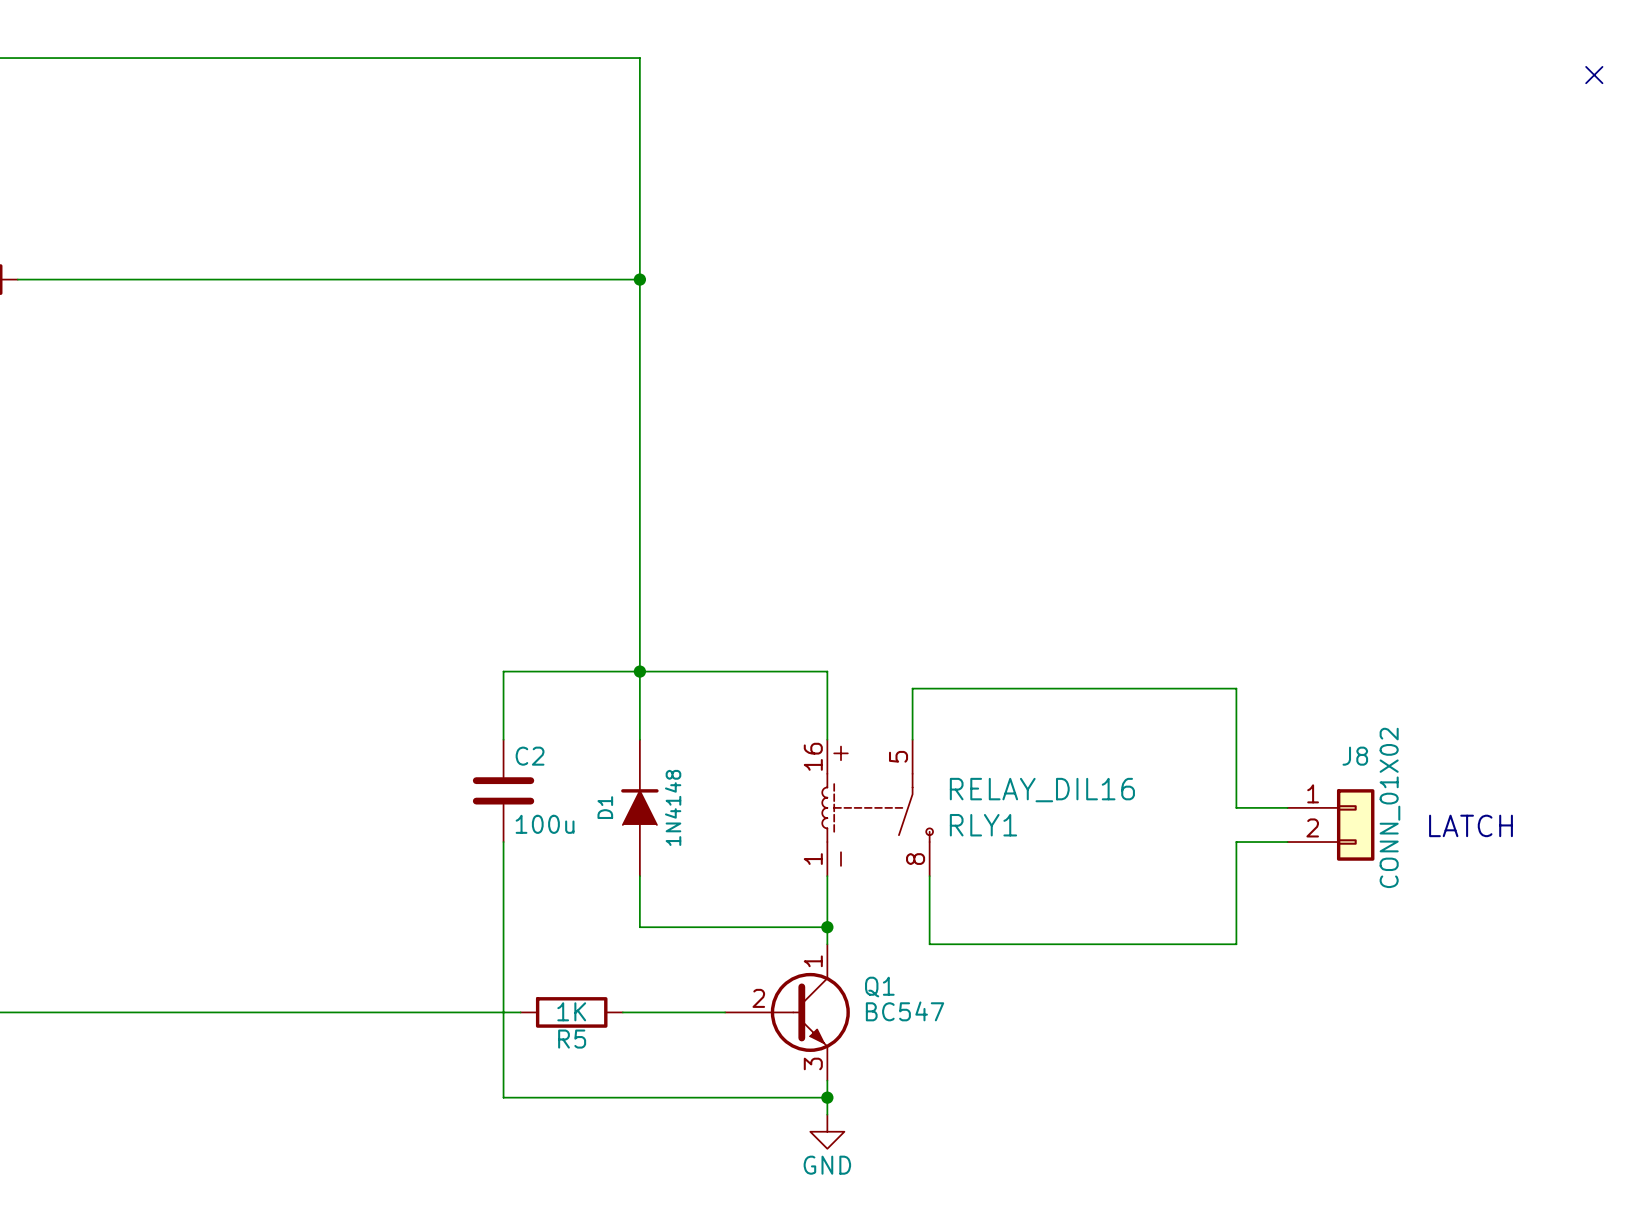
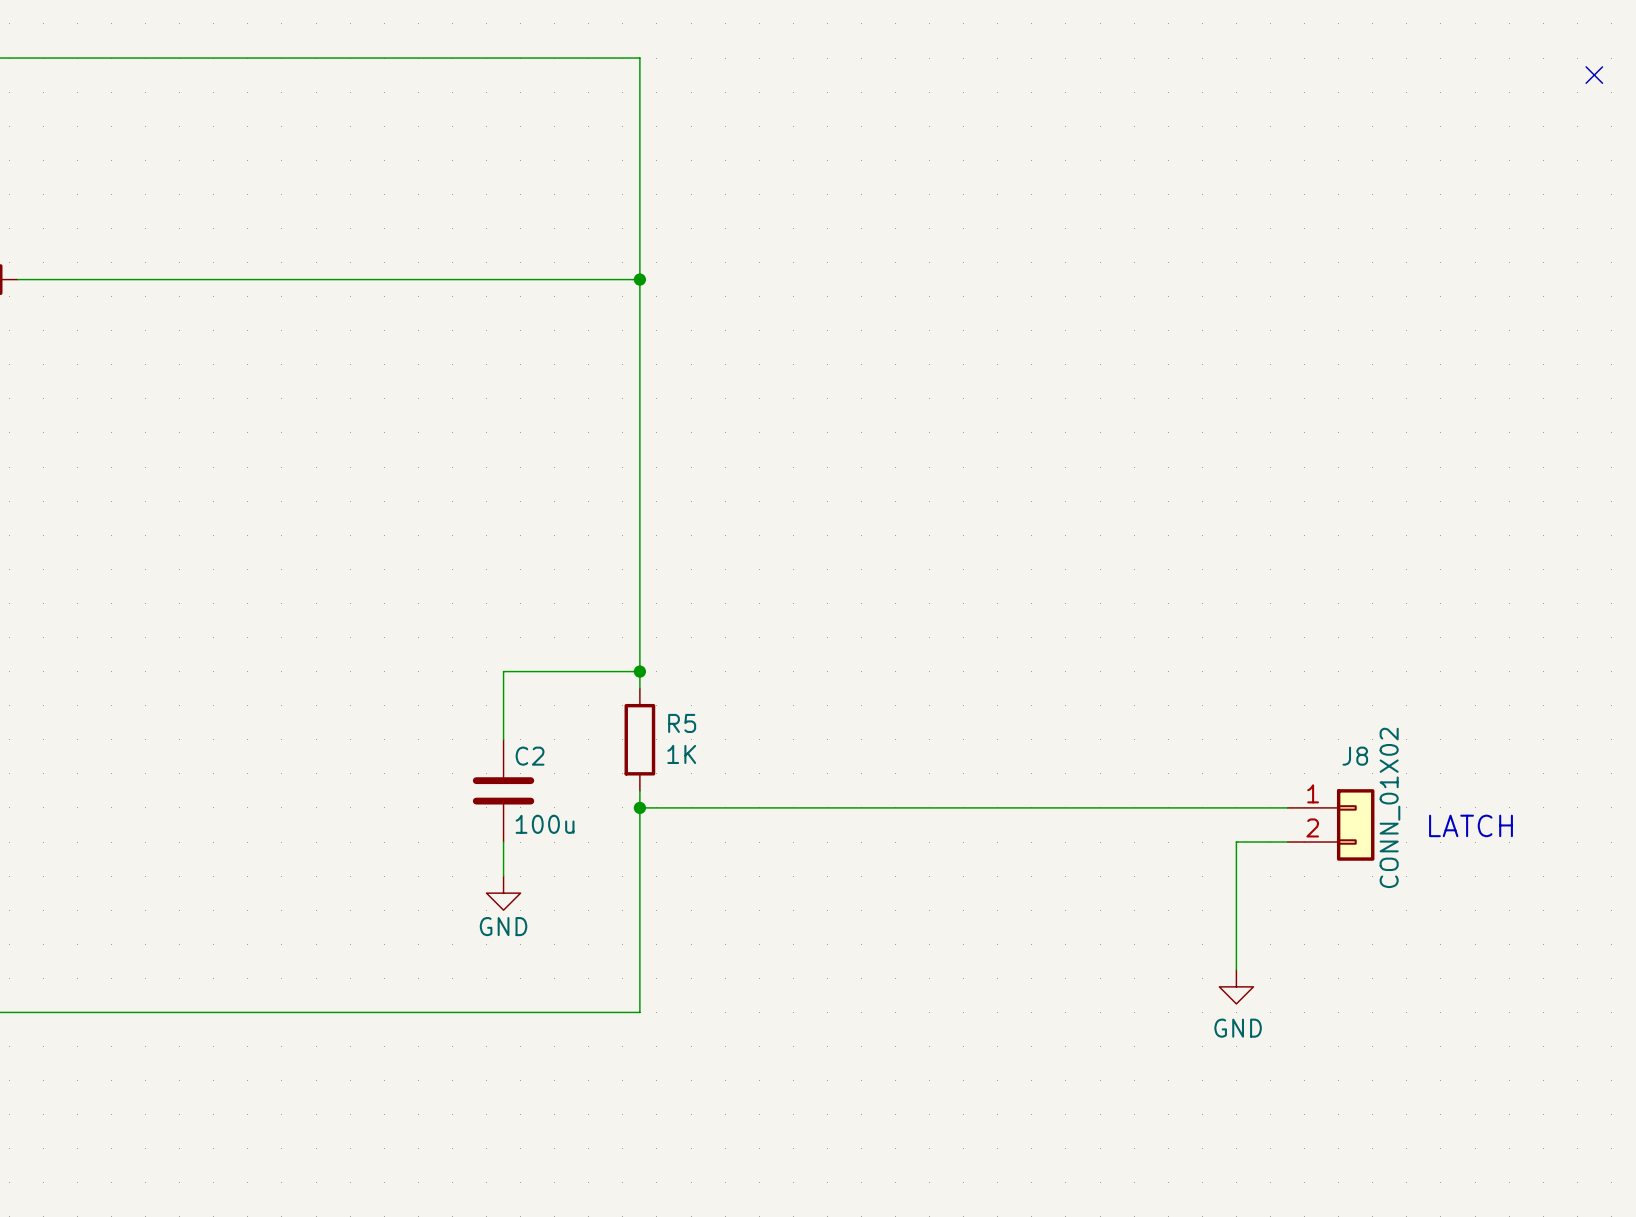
wire: (639, 671) (827, 671) (827, 739) -> none
wire: (639, 688) (639, 739) -> none
wire: (912, 739) (912, 688) (1236, 688) (1236, 807) -> (639, 807) (1236, 807)
D1: 1N4148 (639, 807) -> none
junction: none -> (639, 807)
RLY1: RELAY_DIL16 (877, 807) -> none
wire: (503, 876) (503, 1097) (827, 1097) -> none
wire: (827, 876) (827, 944) -> none
wire: (929, 876) (929, 944) (1236, 944) -> (1236, 969) (1236, 944)
power symbol: none -> GND (503, 893)
wire: (639, 927) (827, 927) -> none
junction: (827, 927) -> none
power symbol: none -> GND (1236, 986)
R5 value position: 1K (571, 1011) -> 1K (681, 754)
wire: none -> (520, 1012) (622, 1012)
R5 rotation: 0° (571, 1012) -> 90° clockwise (639, 739)
R5 position: (571, 1012) -> (639, 739)
wire: (639, 1012) (725, 1012) -> (639, 1012) (639, 927)
Q1: BC547 (787, 1012) -> none
R5 name position: R5 (572, 1039) -> R5 (682, 723)
wire: (827, 1080) (827, 1114) -> none
junction: (827, 1097) -> none
power symbol: GND (827, 1131) -> none

